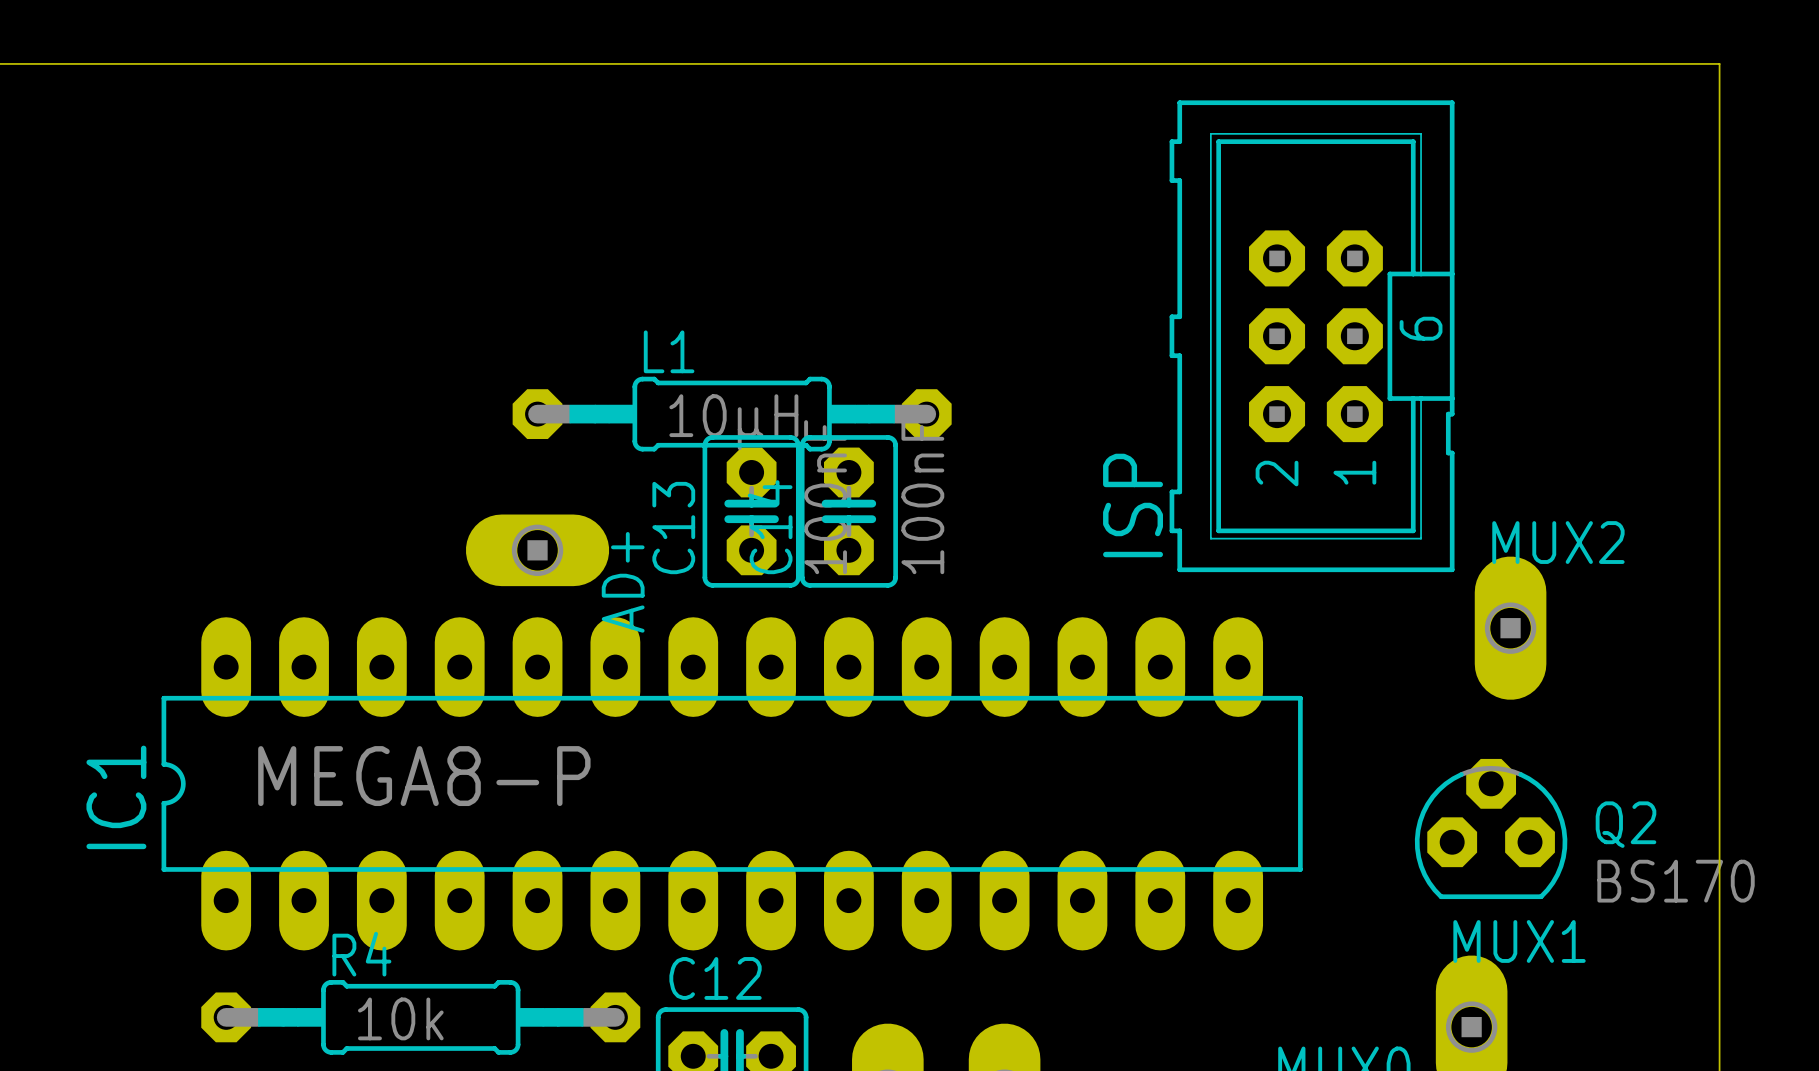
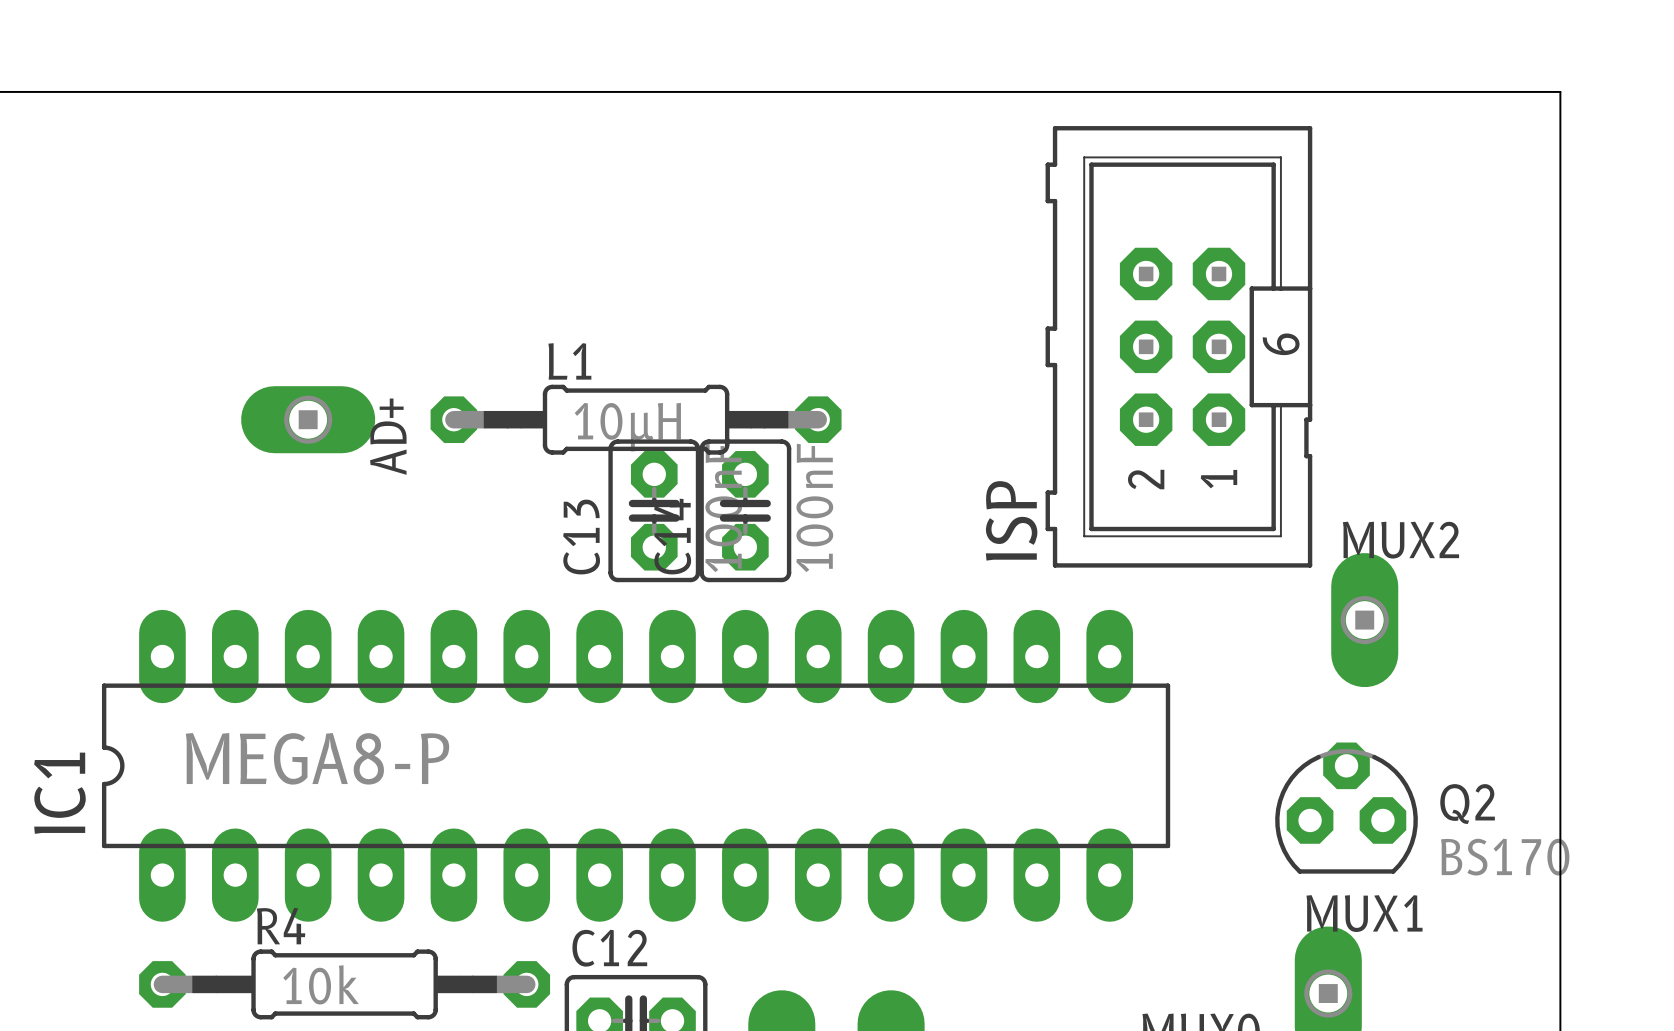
AD+ position: (537, 550) -> (308, 419)

